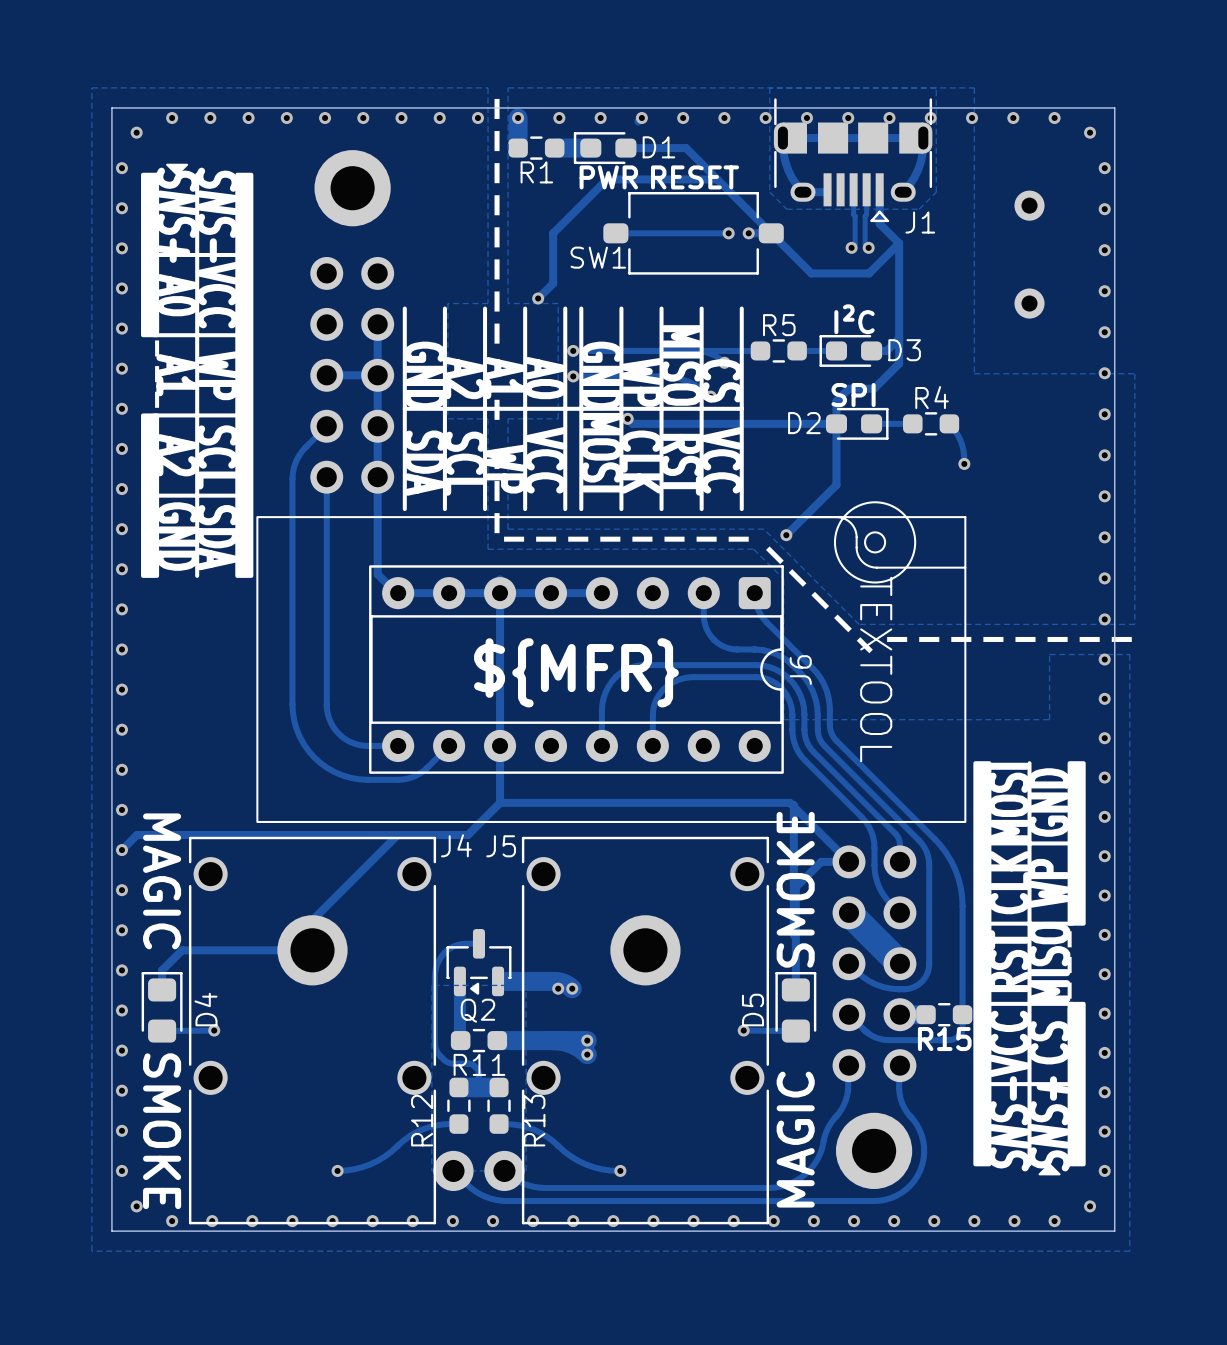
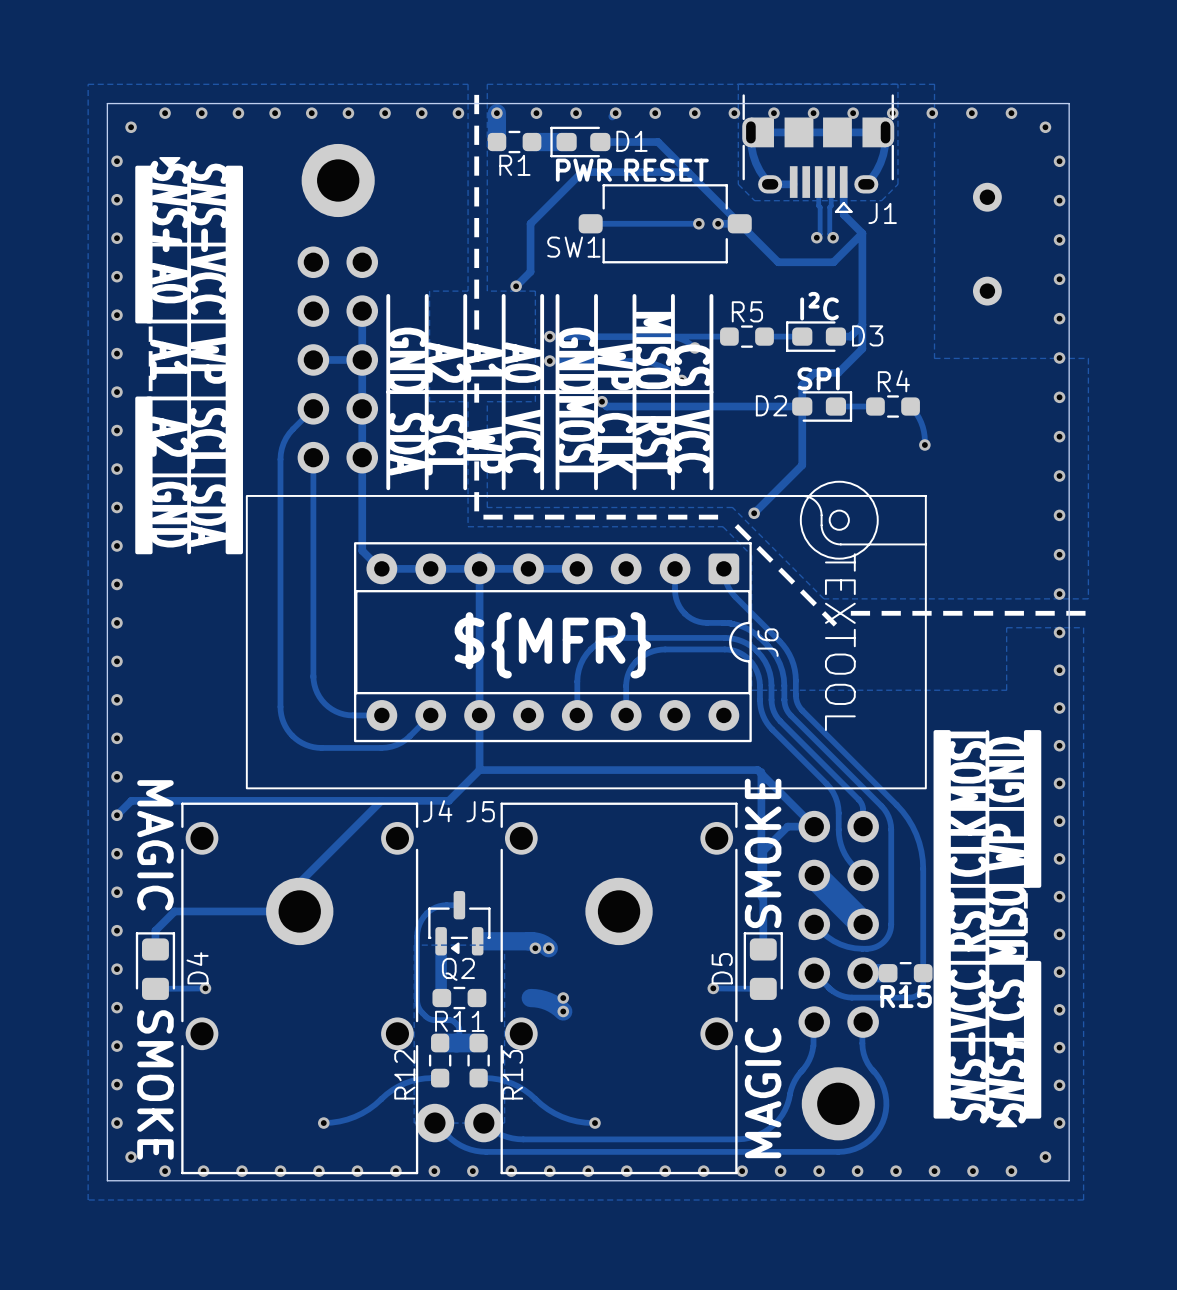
track: (292, 704) (296, 729) (304, 744) (314, 757) (335, 772) (351, 777) (368, 779) -> (280, 675) (281, 714) (285, 726) (292, 735) (302, 743) (313, 747) (352, 747)
track: (497, 1040) (587, 1040) -> none

